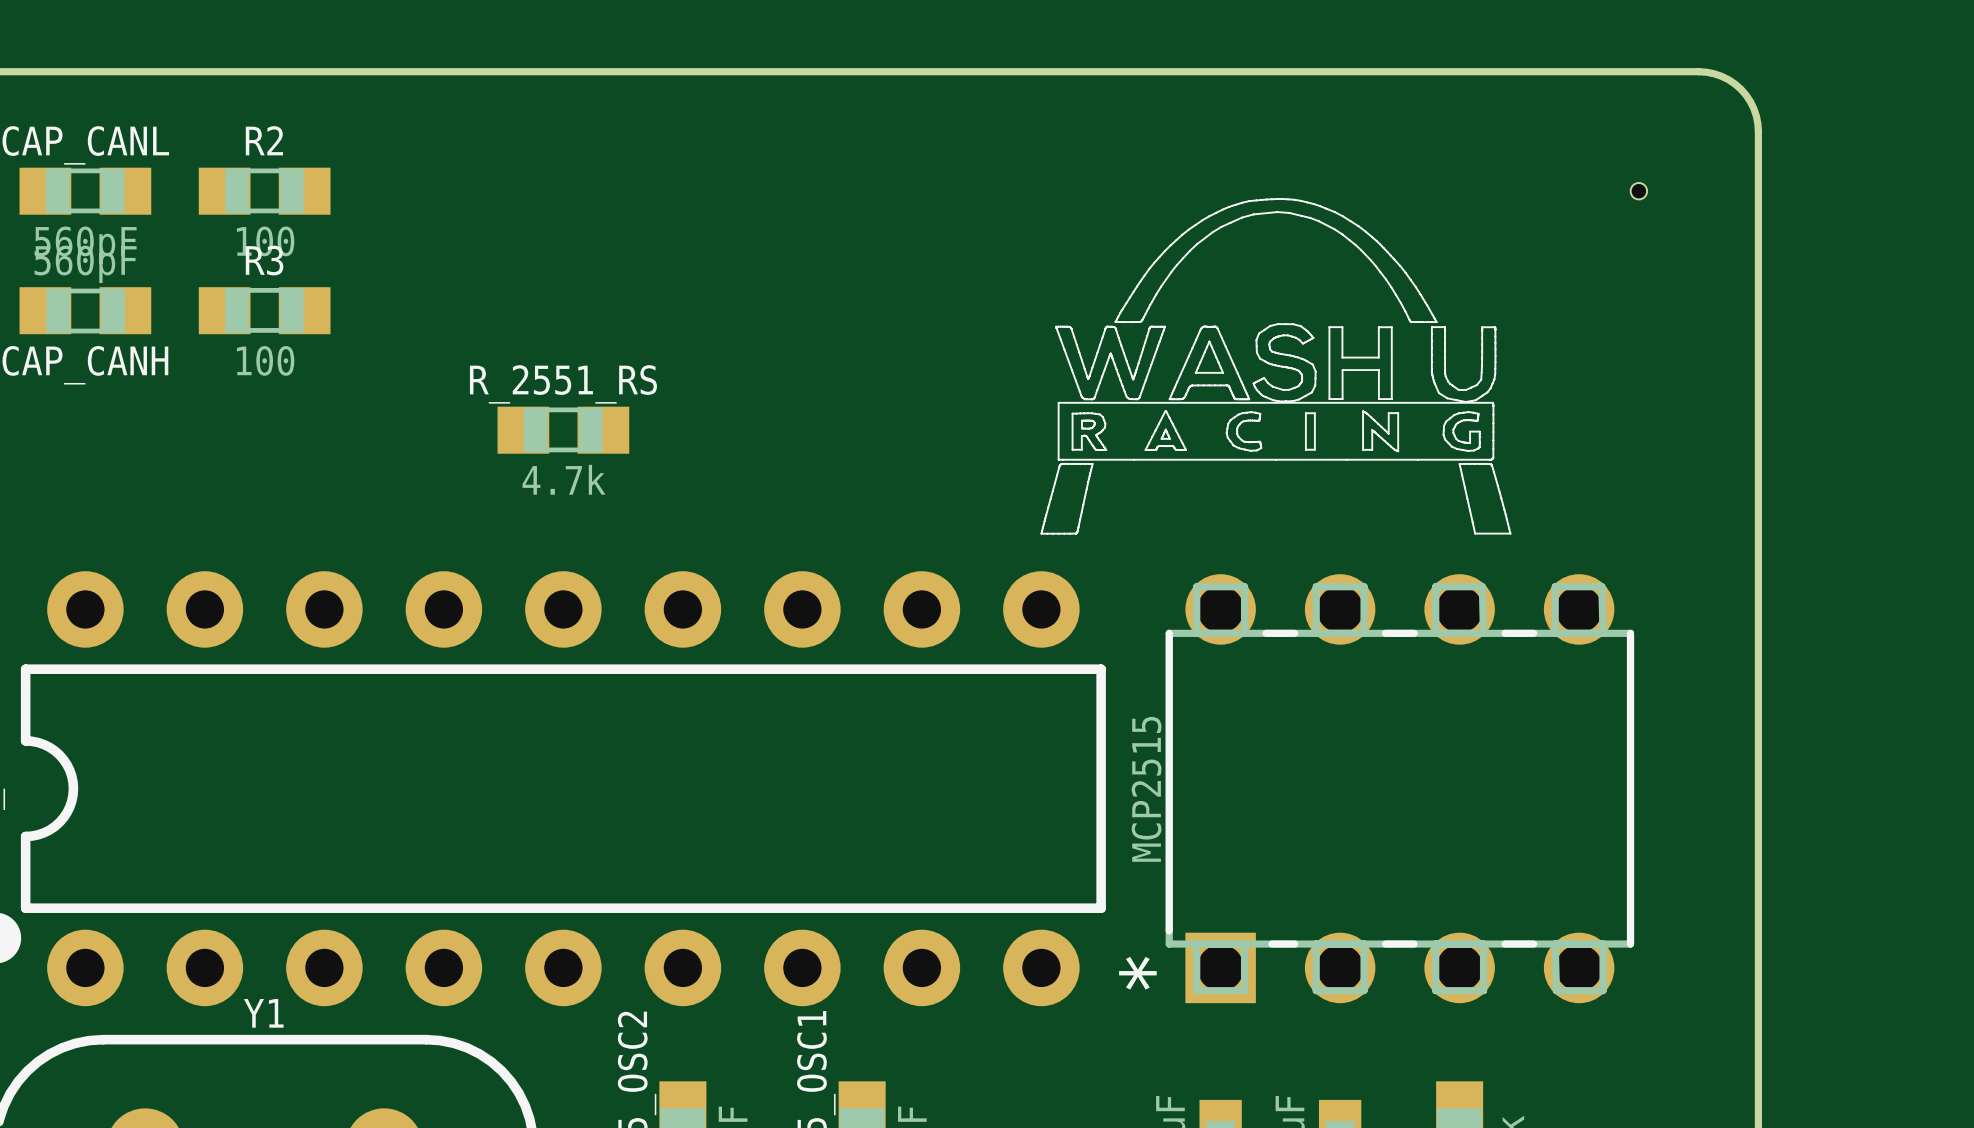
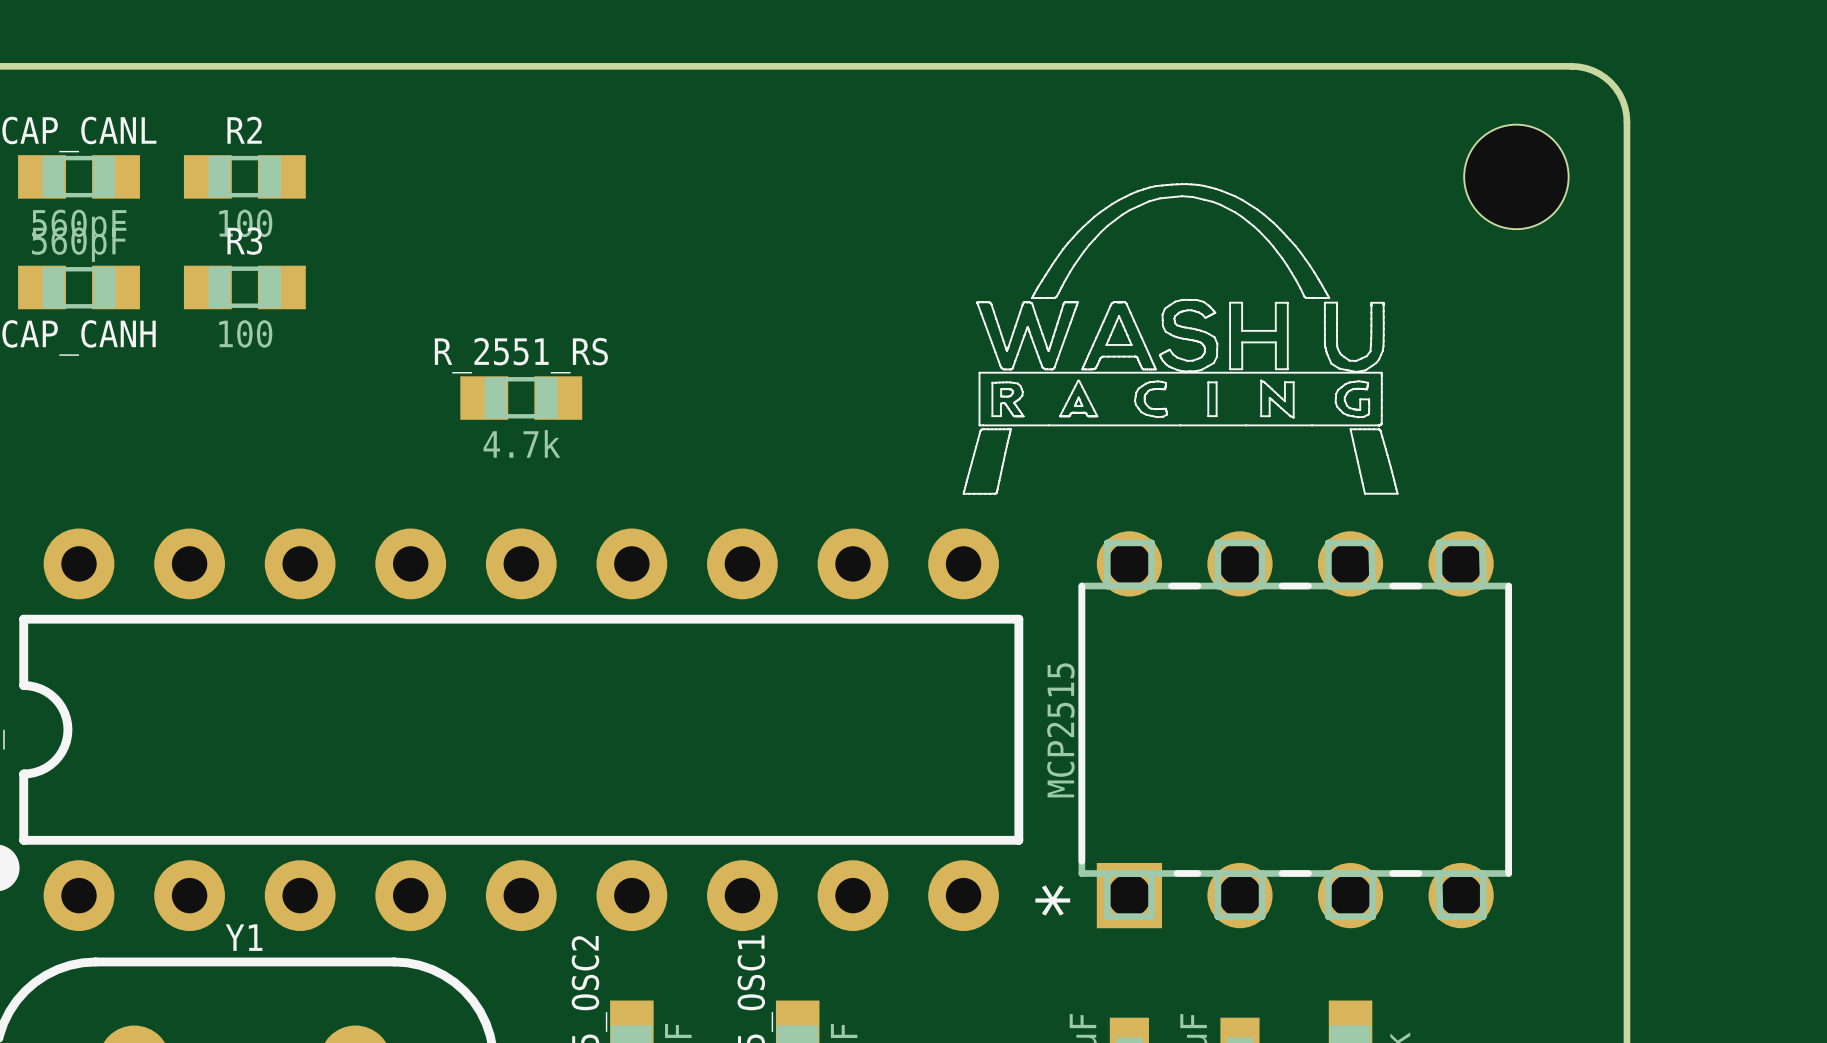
hole size: [1630, 182, 1648, 200] -> [1464, 124, 1569, 230]

